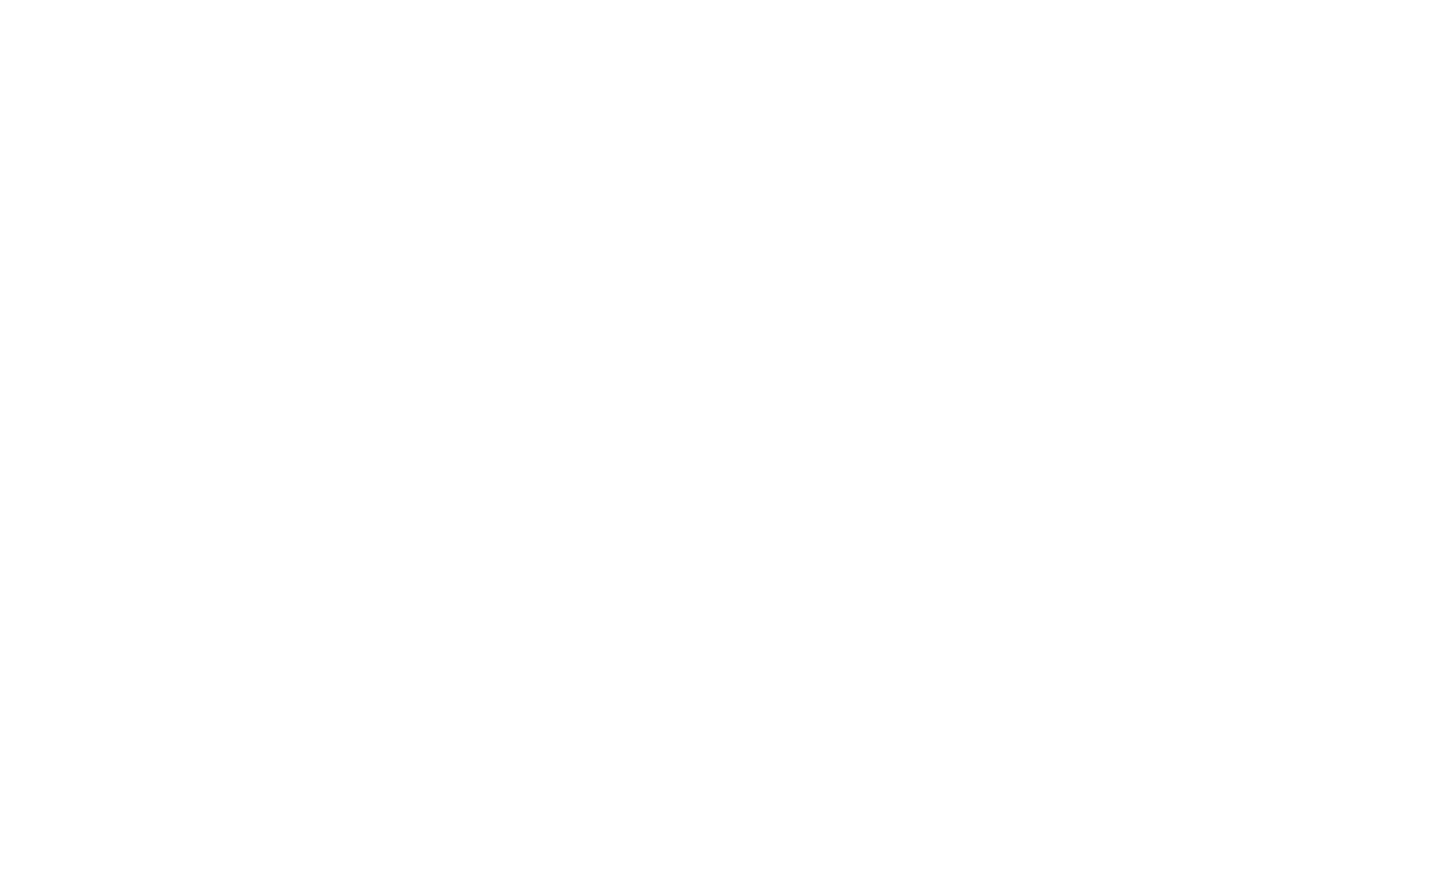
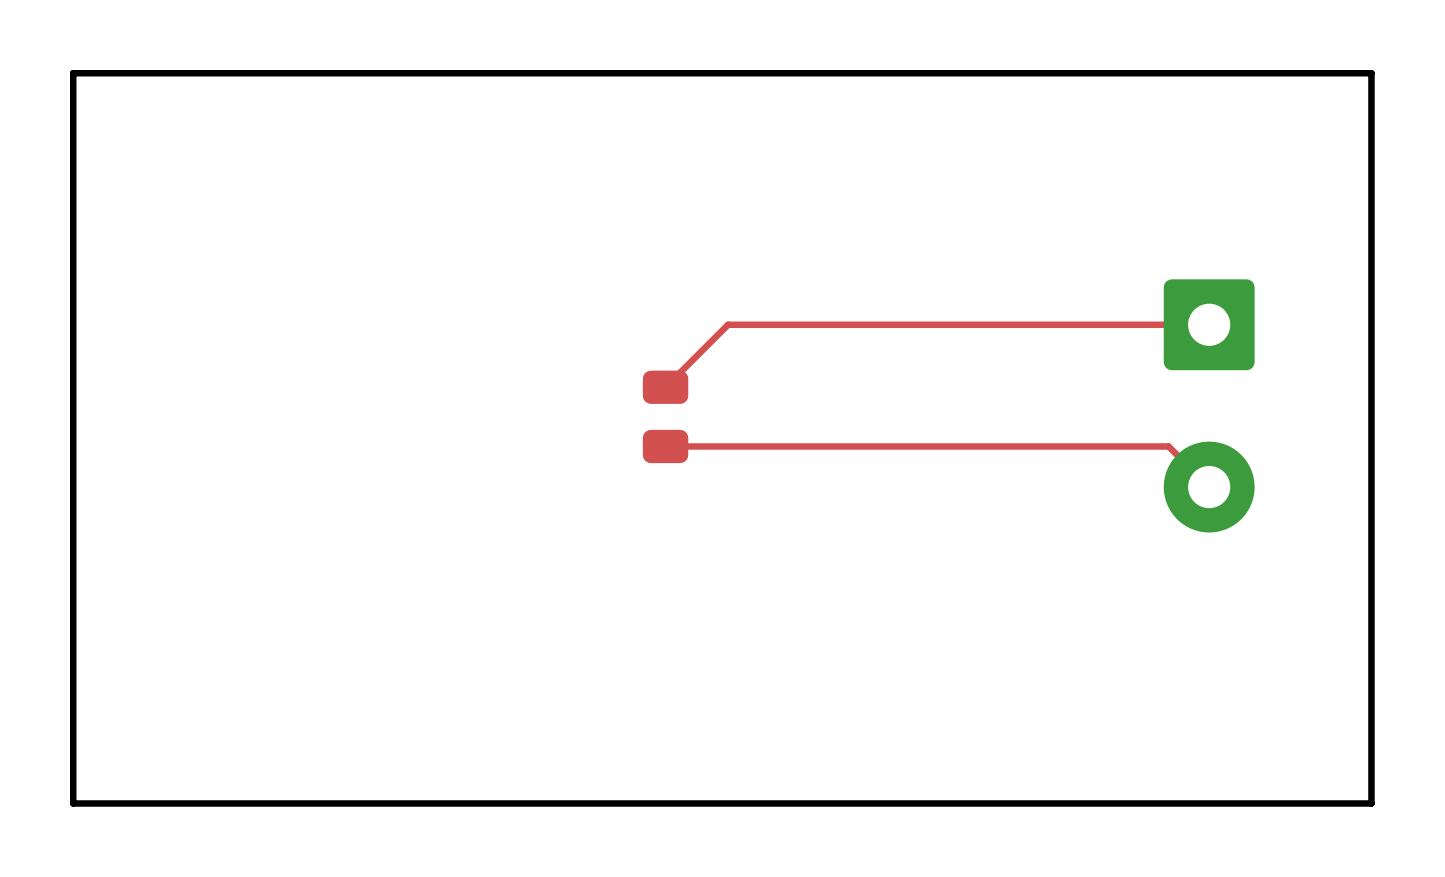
board edge: none -> (1371, 73) (73, 73) (73, 803) (1371, 803) (1371, 73)
top track: none -> (1209, 324) (728, 324) (665, 387)
part: none -> (1209, 405)
part: none -> (665, 416)
top track: none -> (665, 446) (1168, 446) (1209, 487)

